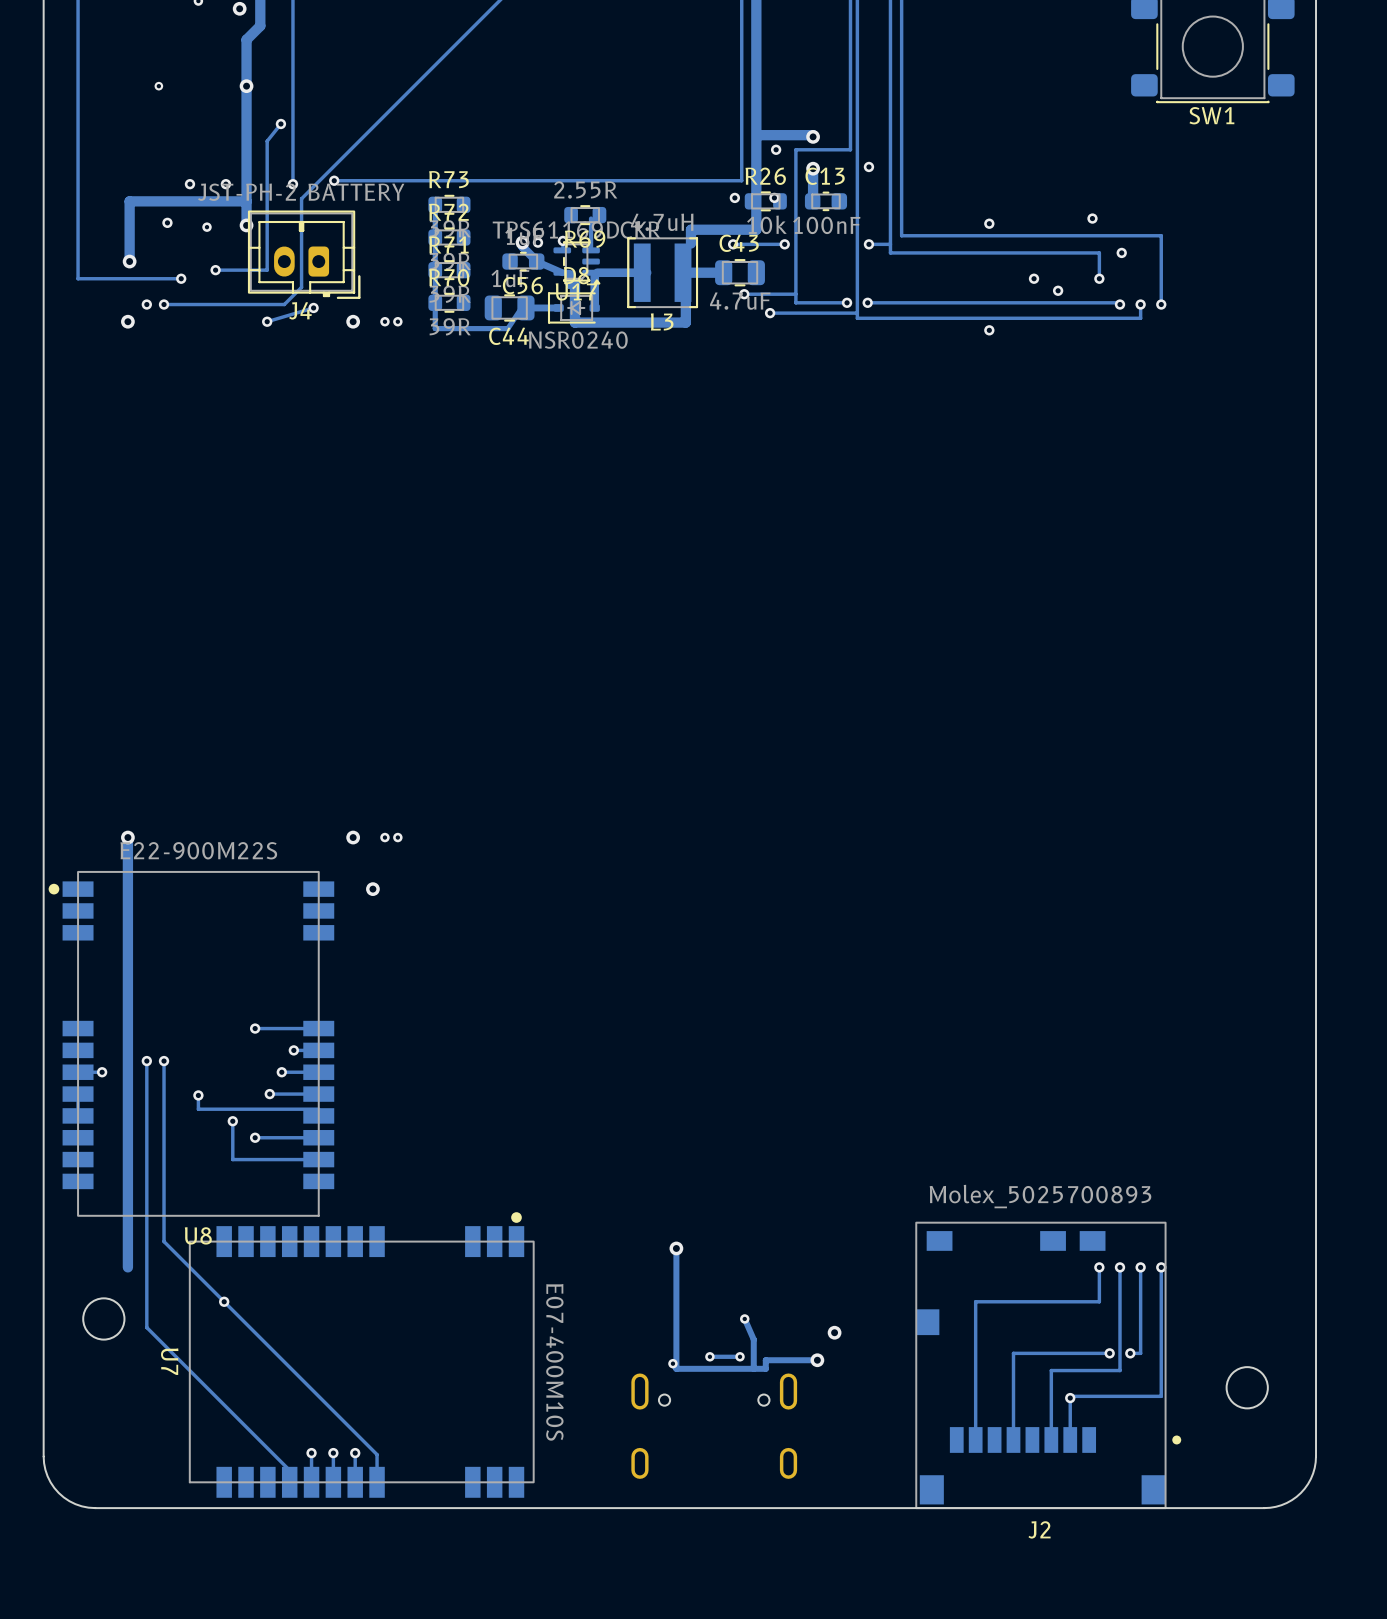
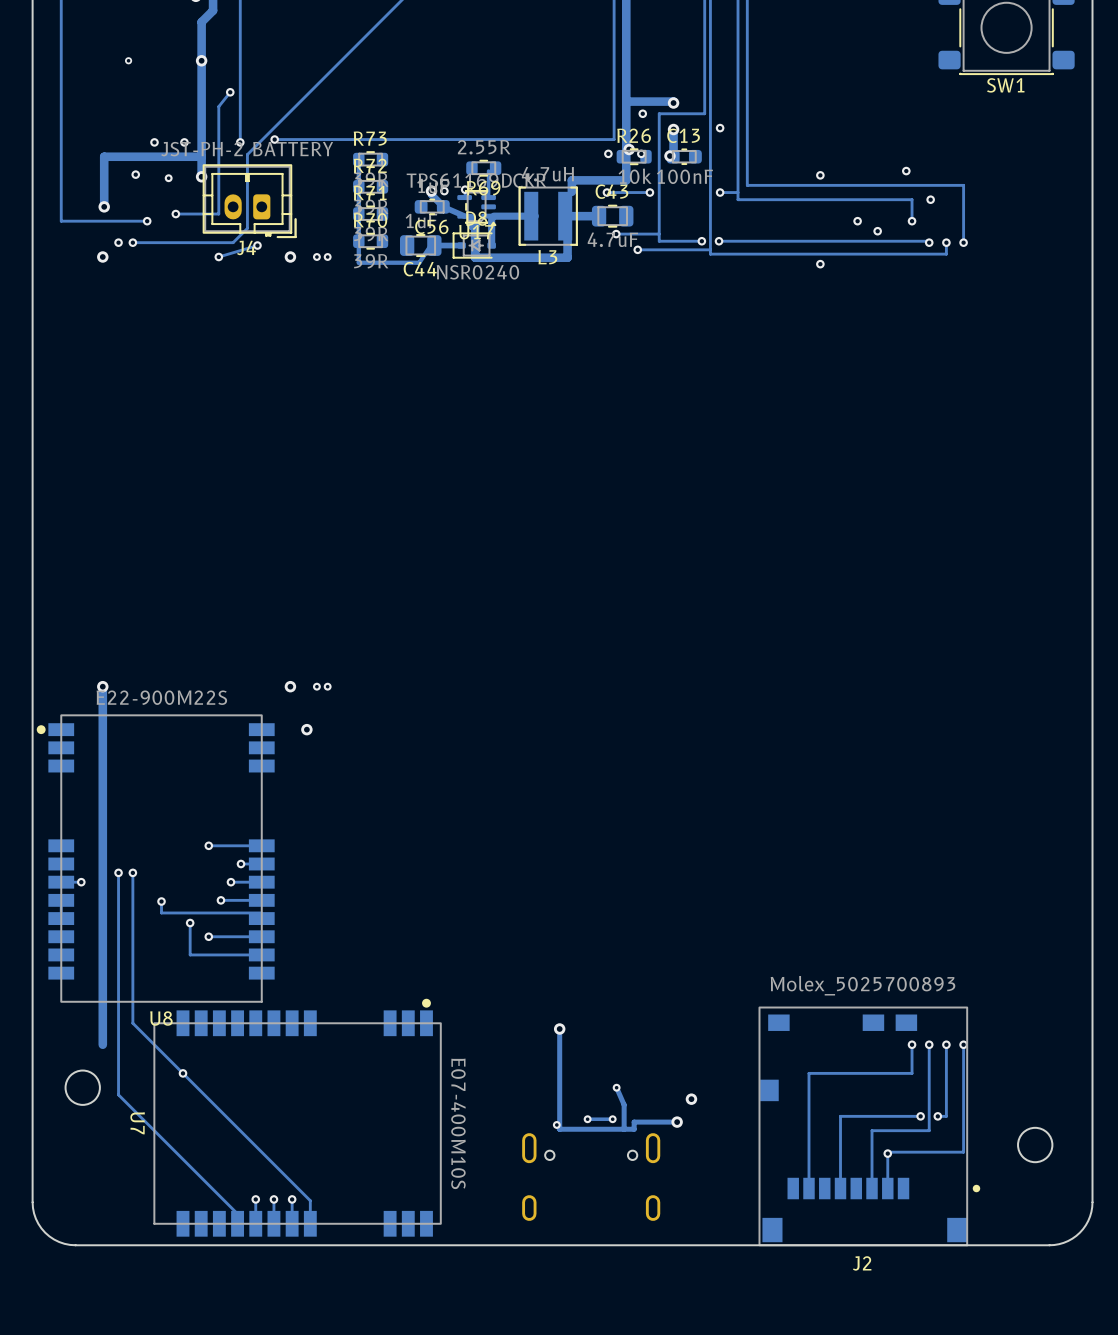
via: none -> (629, 149)
via: none -> (669, 156)

